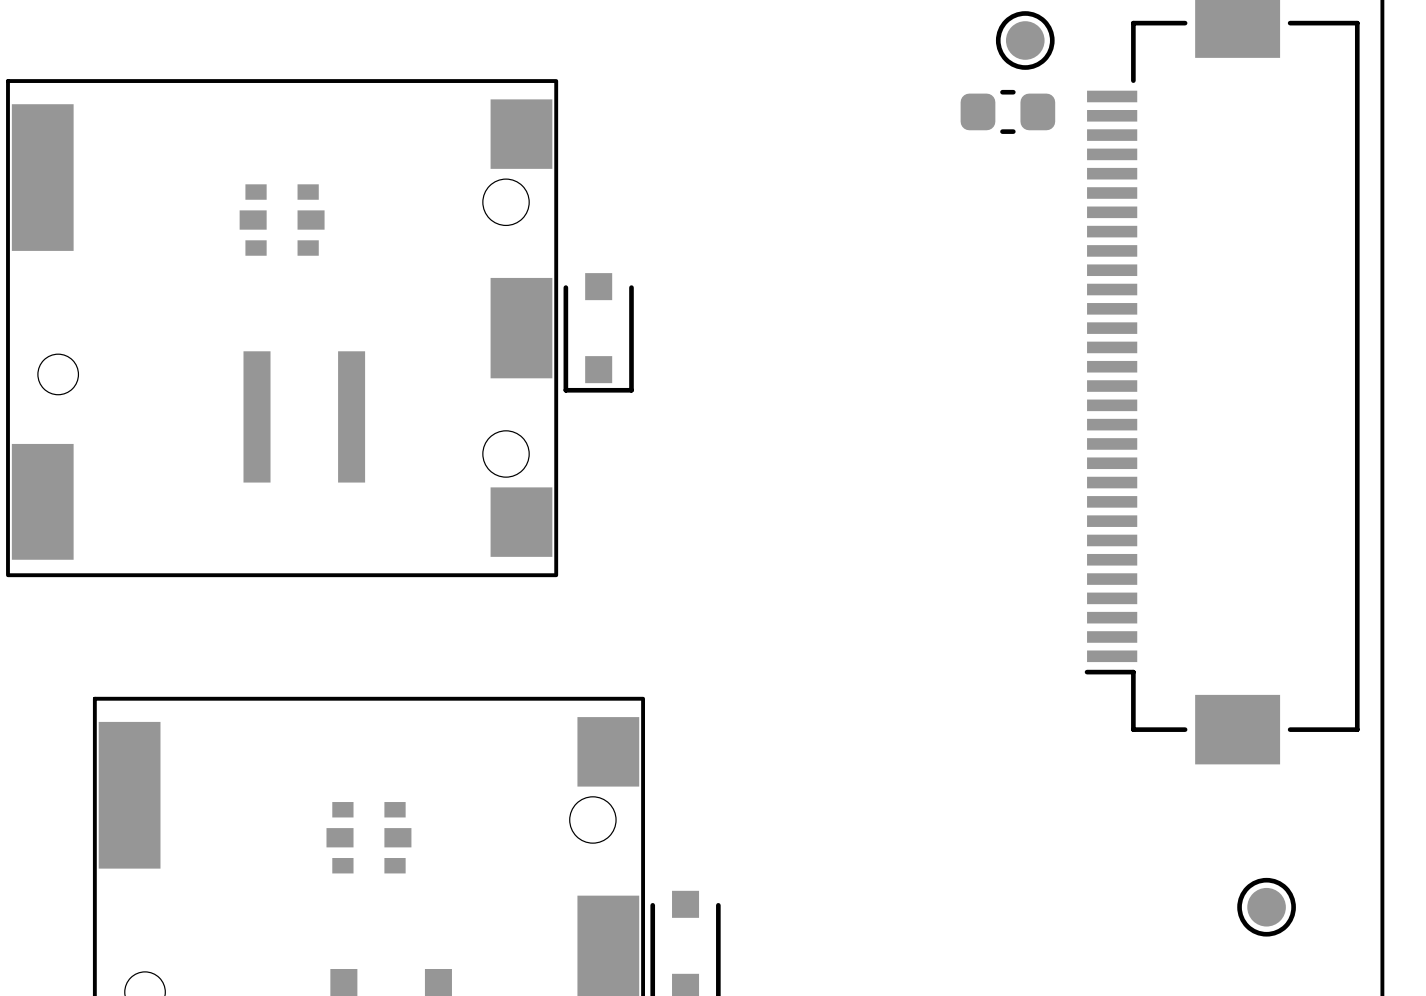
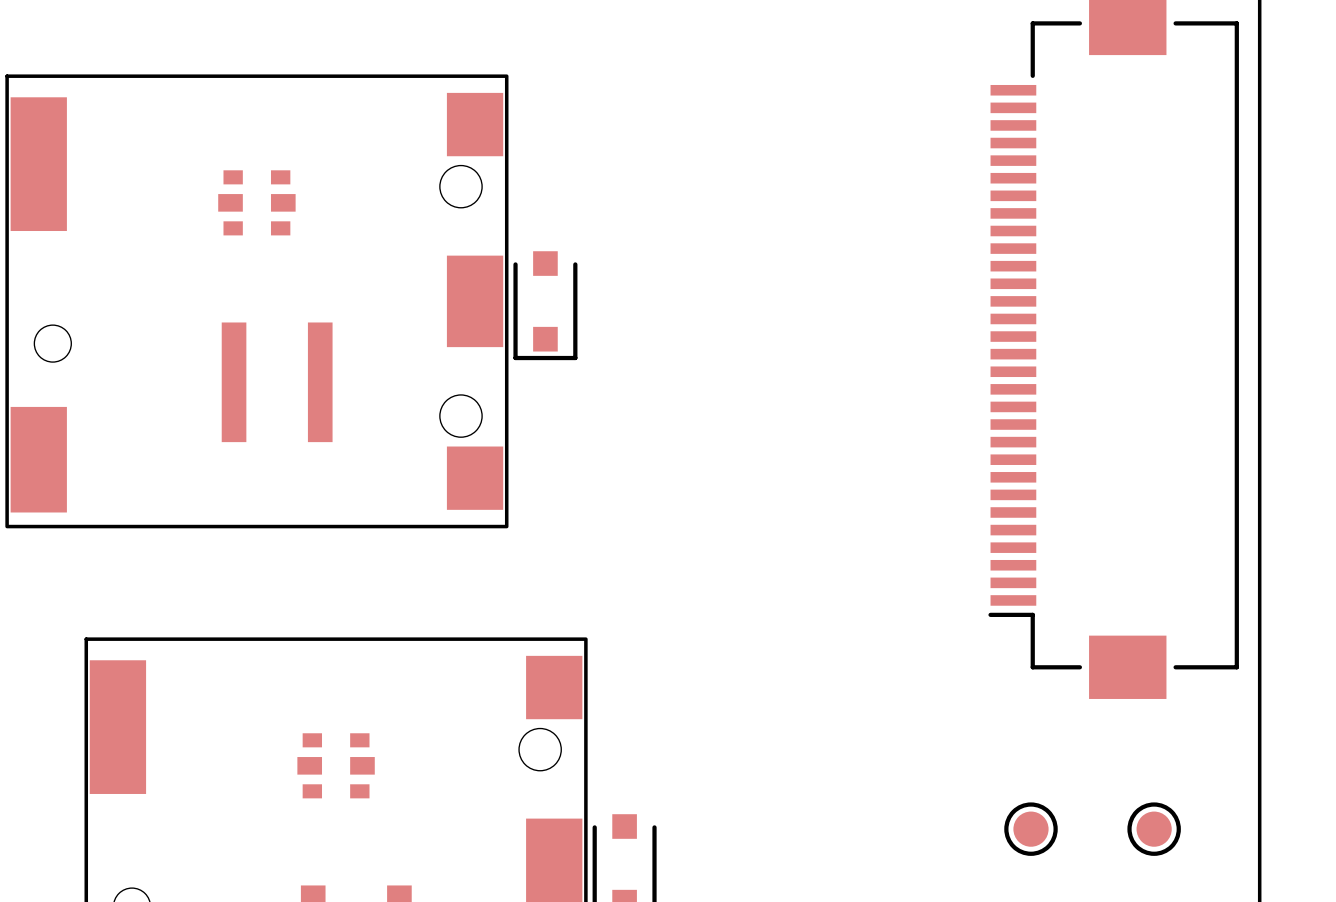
part position: (1025, 40) -> (1030, 829)
part: (1007, 111) -> none

